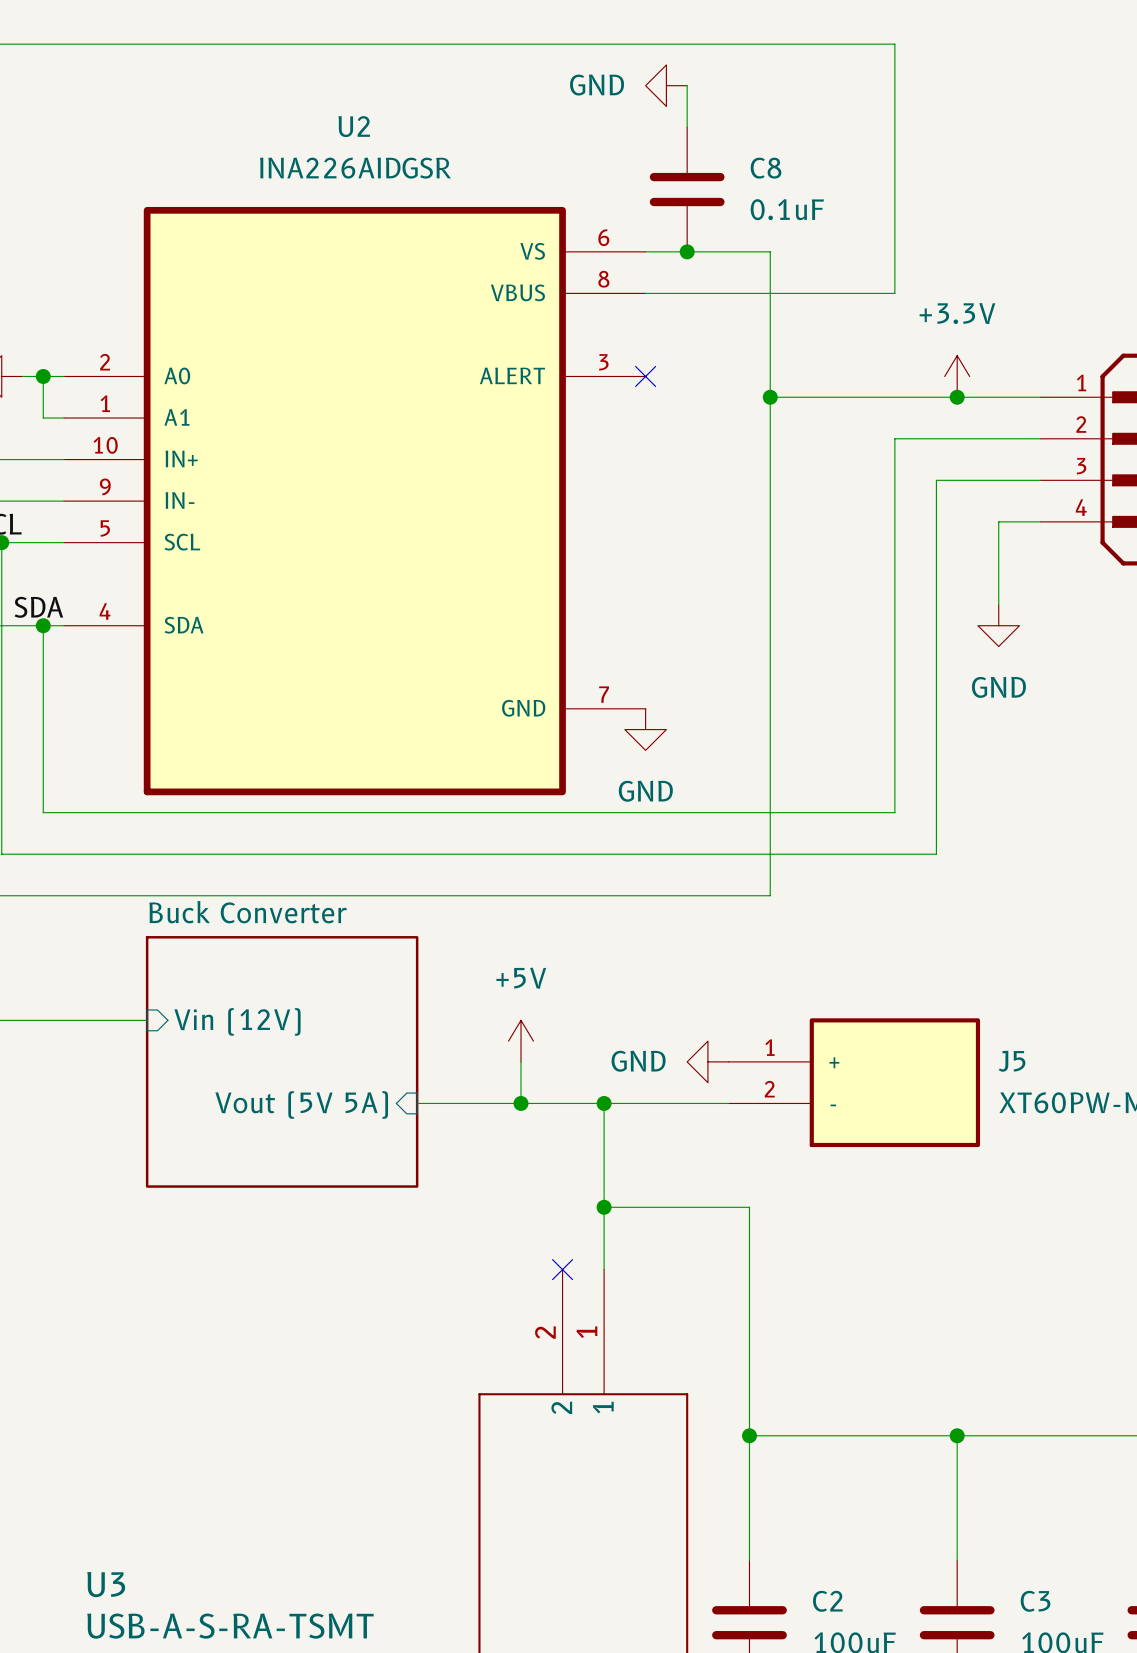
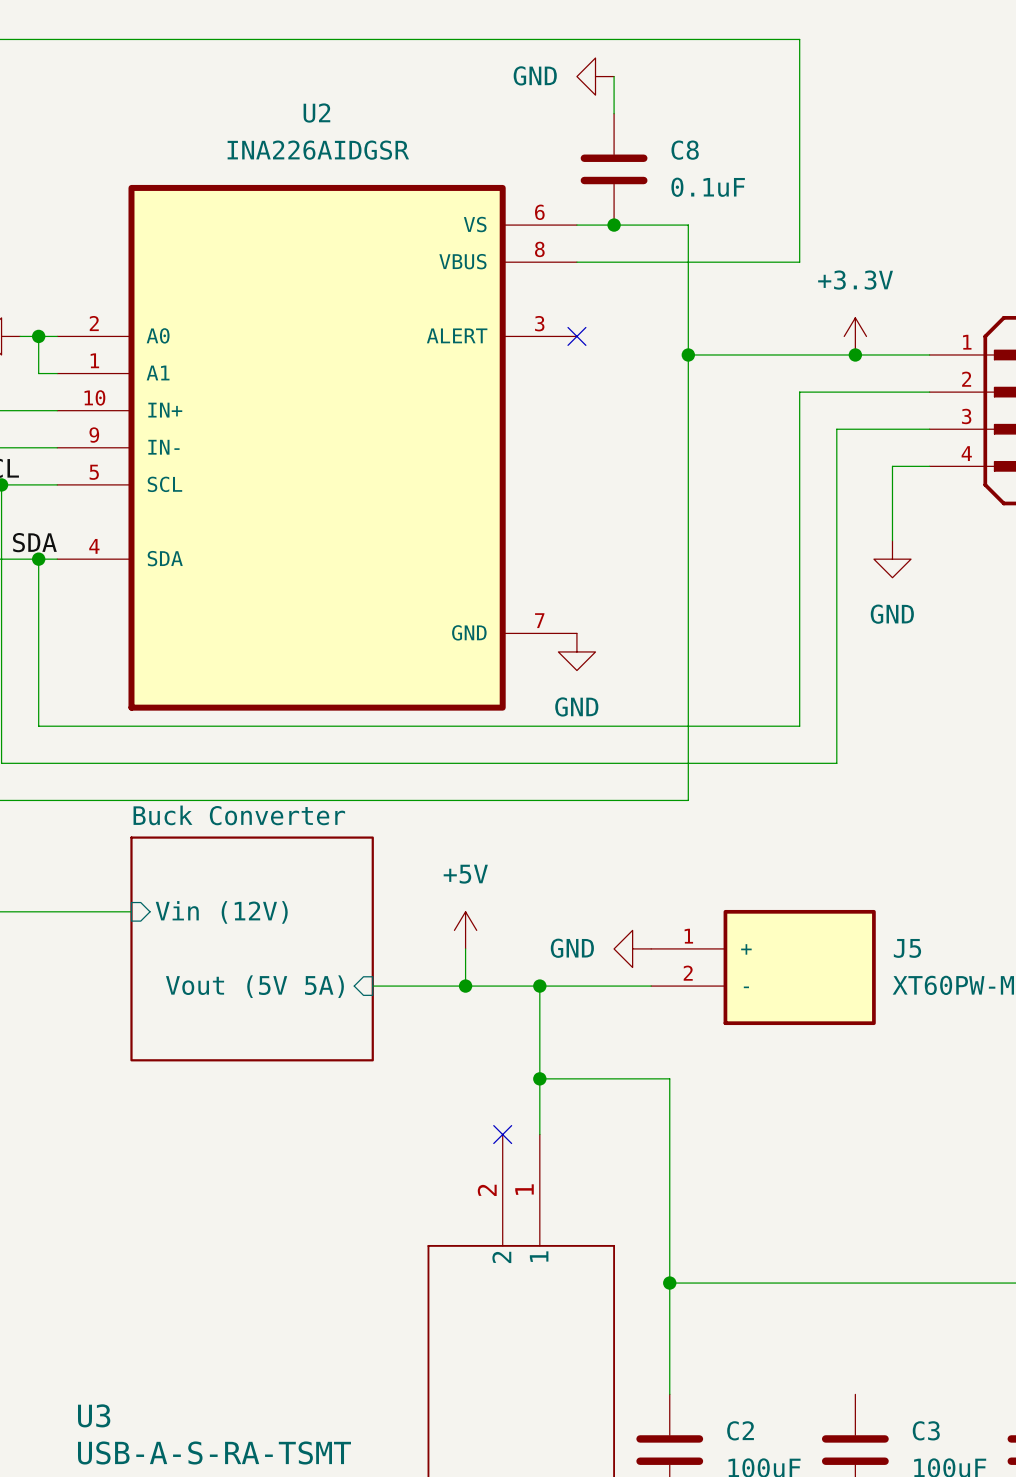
wire: (957, 1435) (957, 1560) -> none
junction: (957, 1435) -> none

